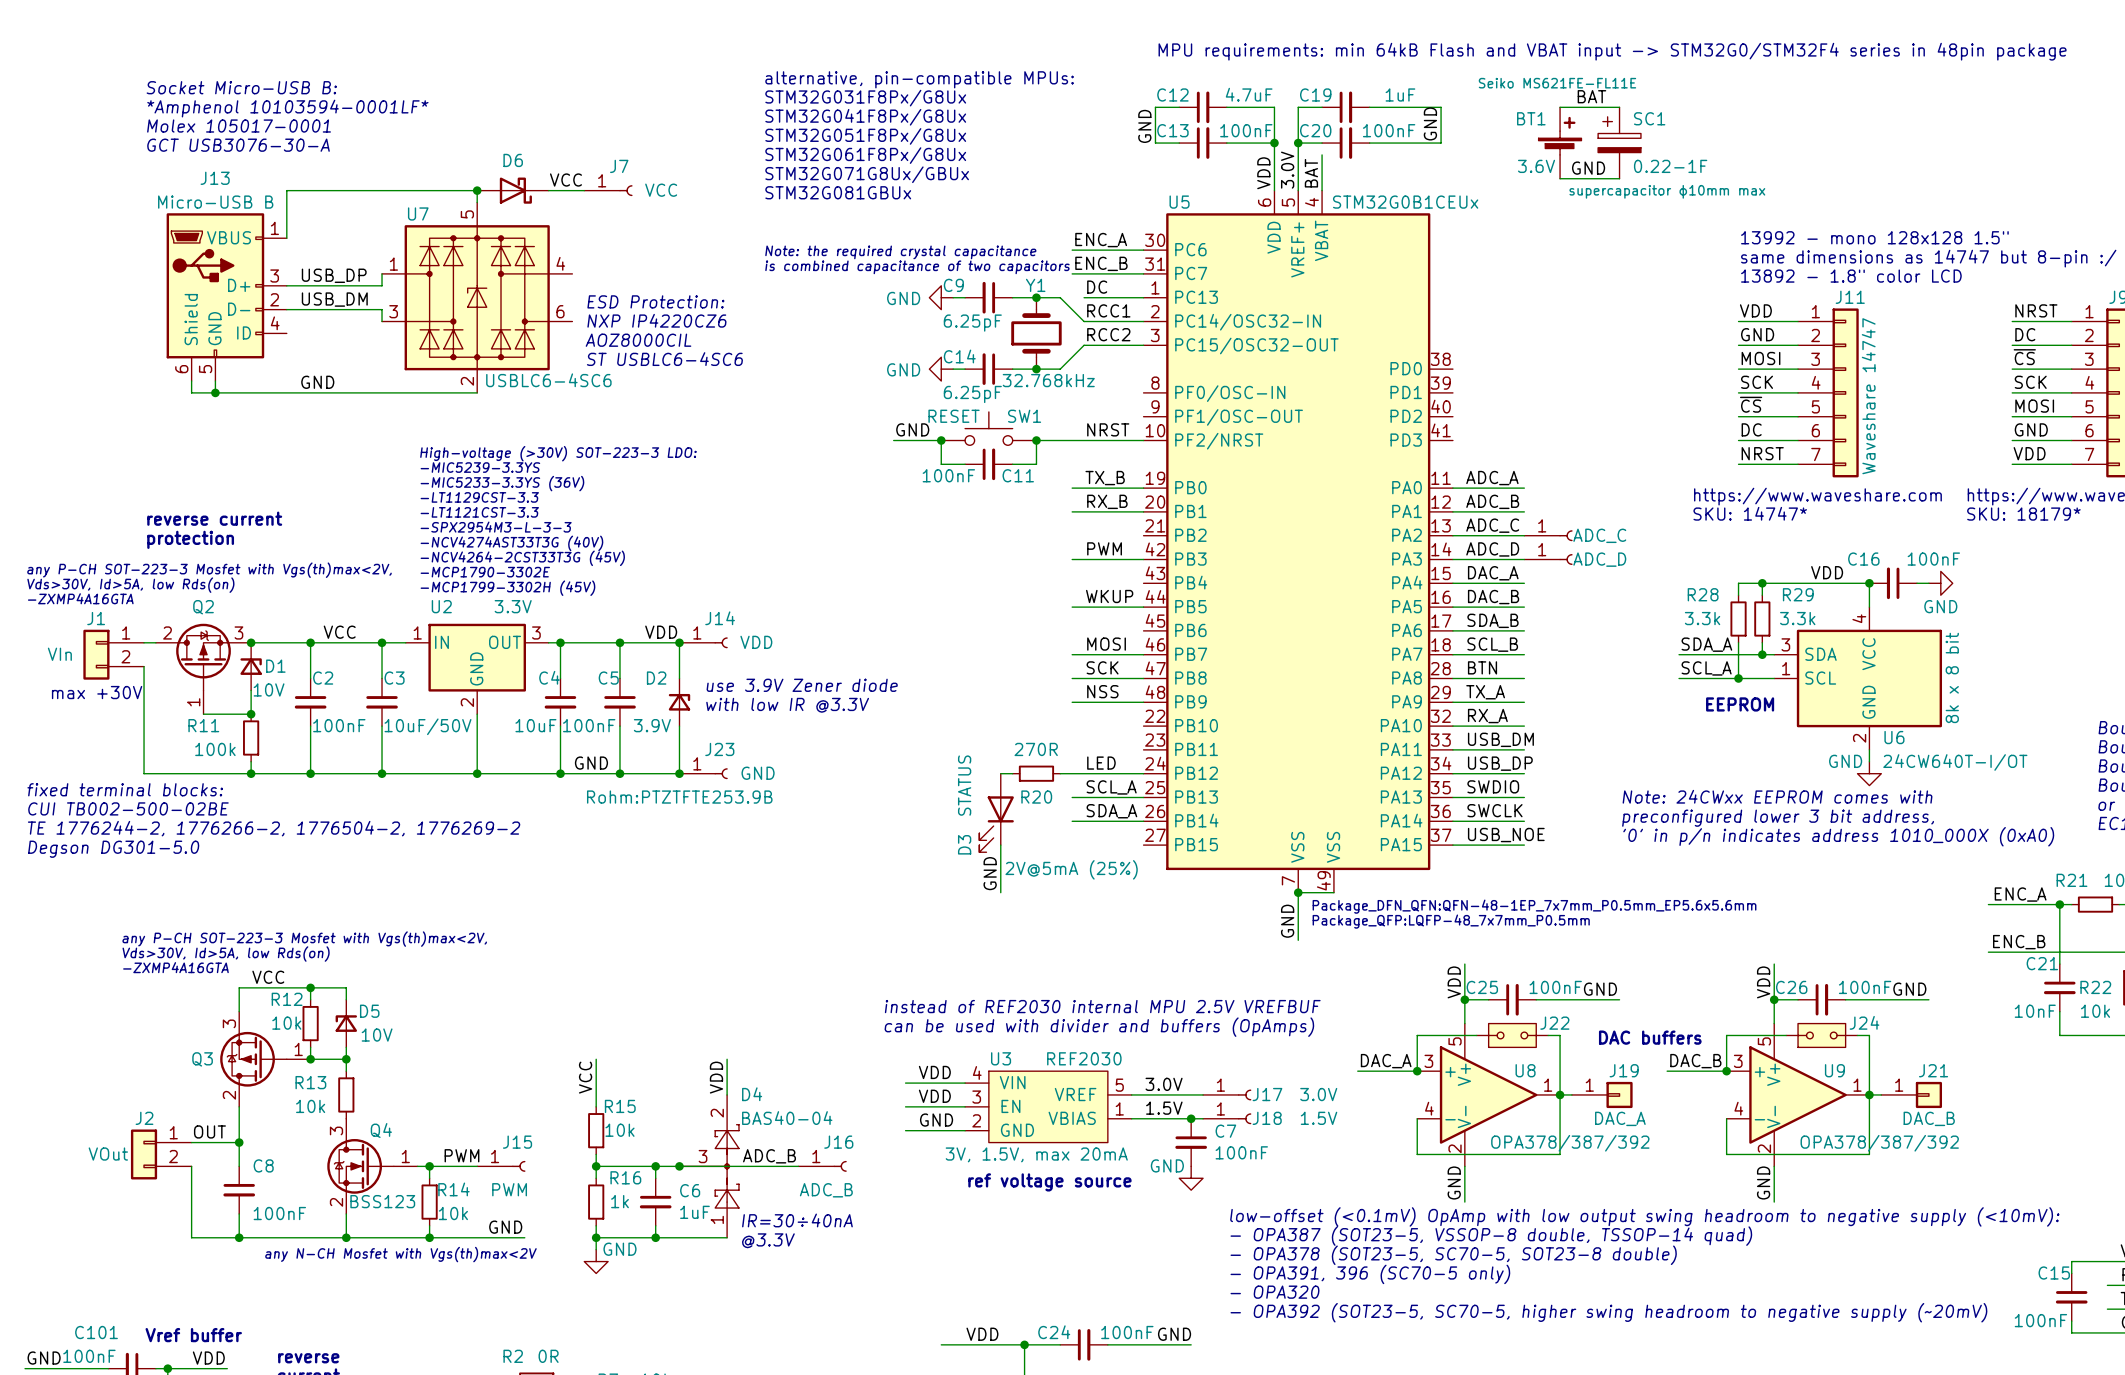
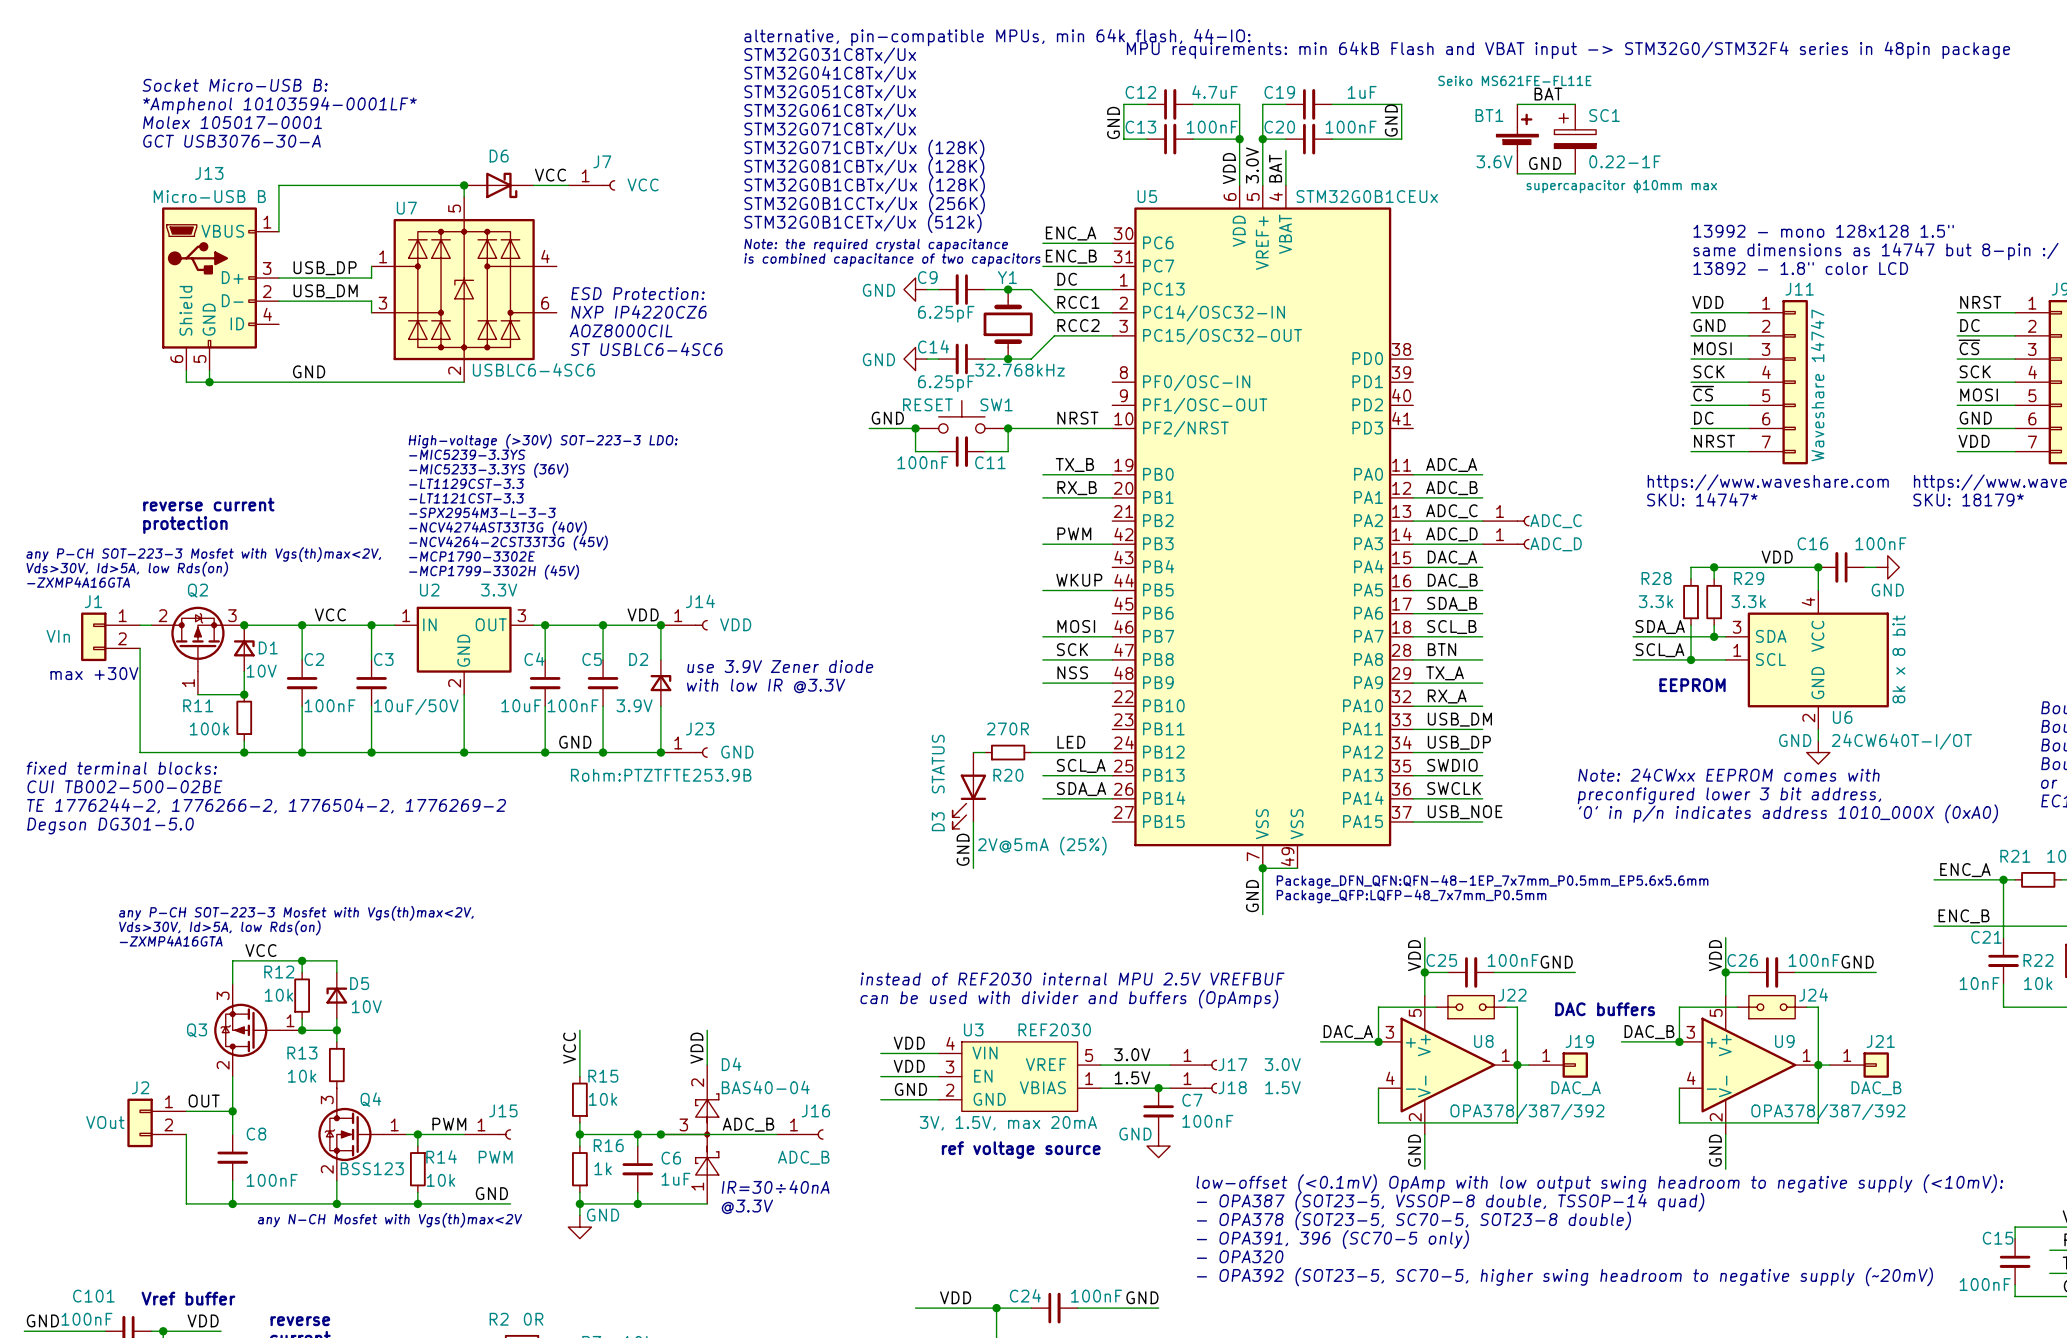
text: none -> alternative, pin-compatible MPUs, min 64k flash, 44-IO: (997, 37)
text: none -> STM32G031C8Tx/Ux (830, 55)
text: alternative, pin-compatible MPUs: (919, 79) -> STM32G041C8Tx/Ux (830, 74)
text: STM32G031F8Px/G8Ux (865, 98) -> STM32G051C8Tx/Ux (830, 92)
text: STM32G041F8Px/G8Ux (865, 117) -> STM32G061C8Tx/Ux (830, 111)
text: STM32G051F8Px/G8Ux (865, 136) -> STM32G071C8Tx/Ux (830, 130)
text: STM32G061F8Px/G8Ux (865, 155) -> STM32G071CBTx/Ux (128K) (864, 149)
text: STM32G071G8Ux/GBUx (867, 174) -> STM32G081CBTx/Ux (128K) (864, 167)
text: STM32G081GBUx (838, 192) -> STM32G0B1CBTx/Ux (128K) (864, 186)
text: none -> STM32G0B1CCTx/Ux (256K) (864, 204)
text: none -> STM32G0B1CETx/Ux (512k) (863, 223)

